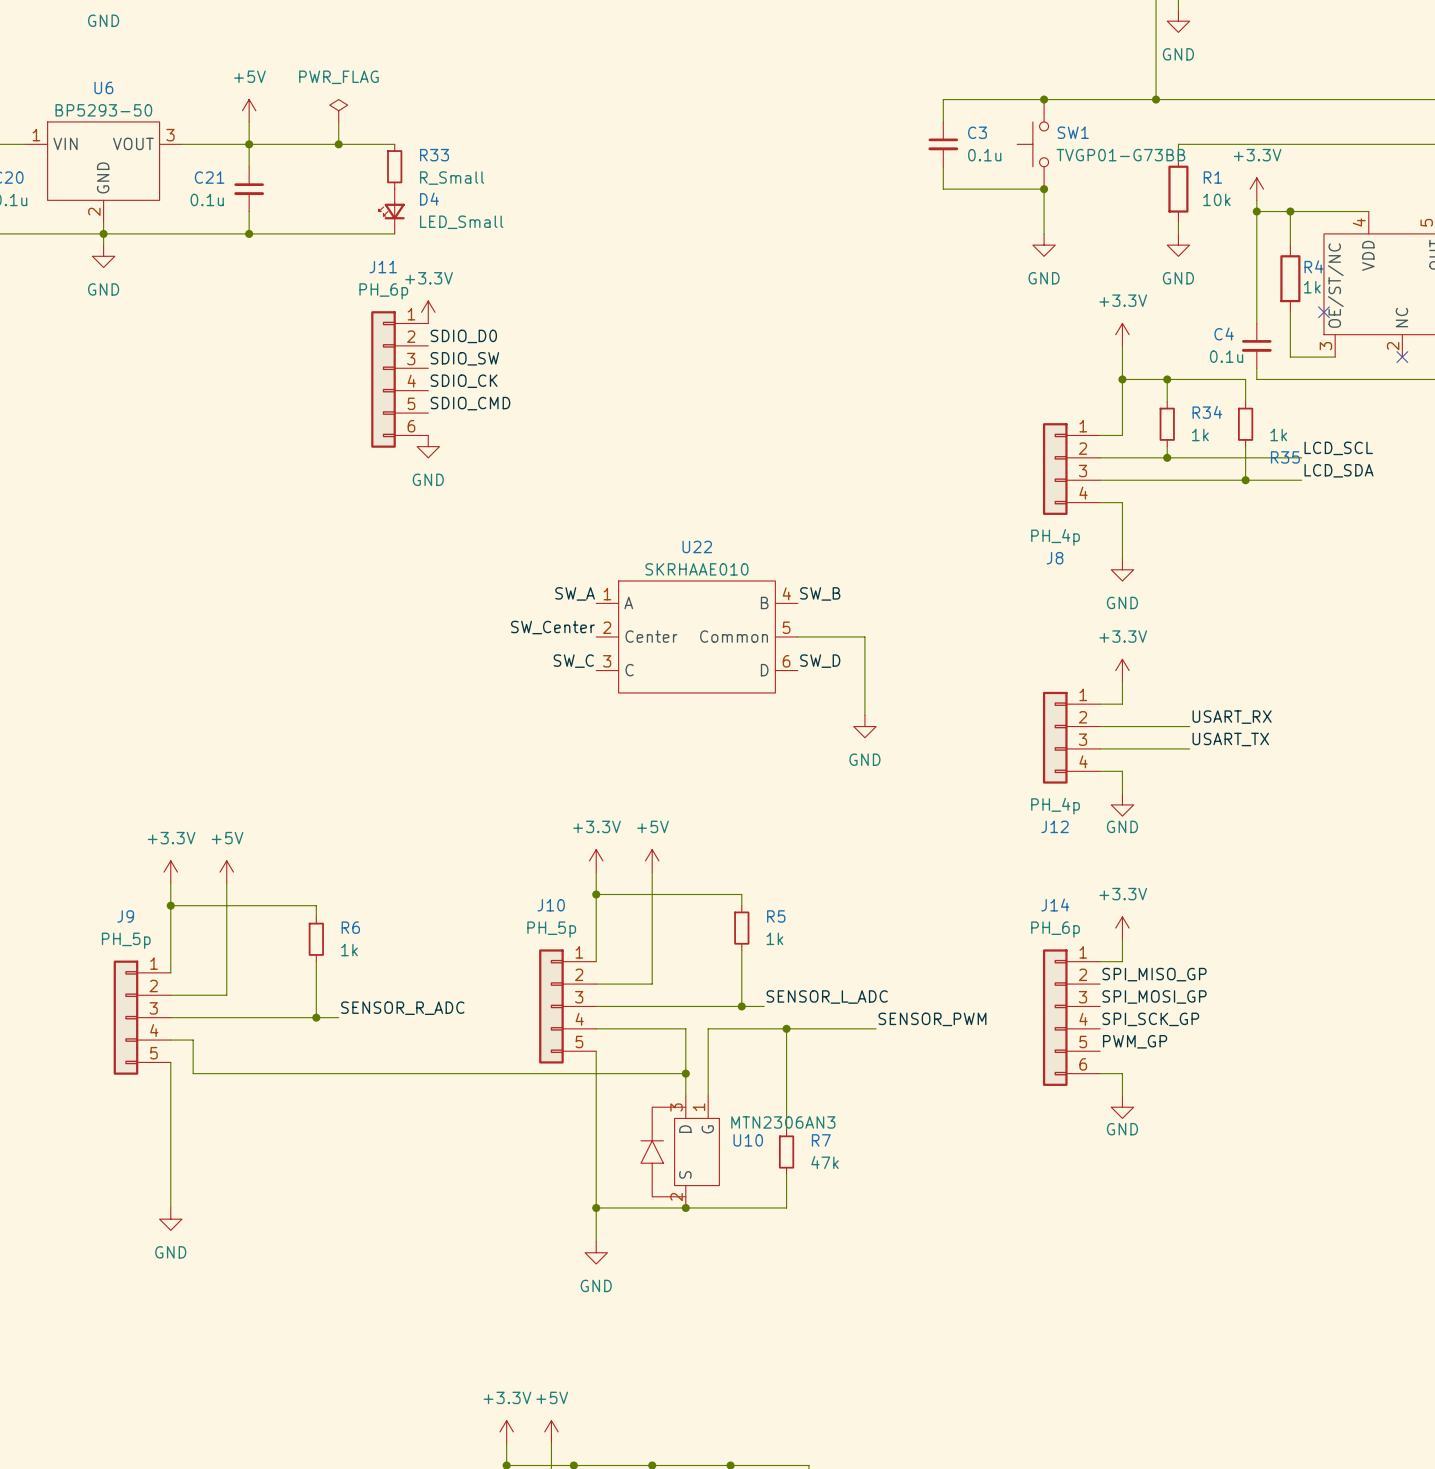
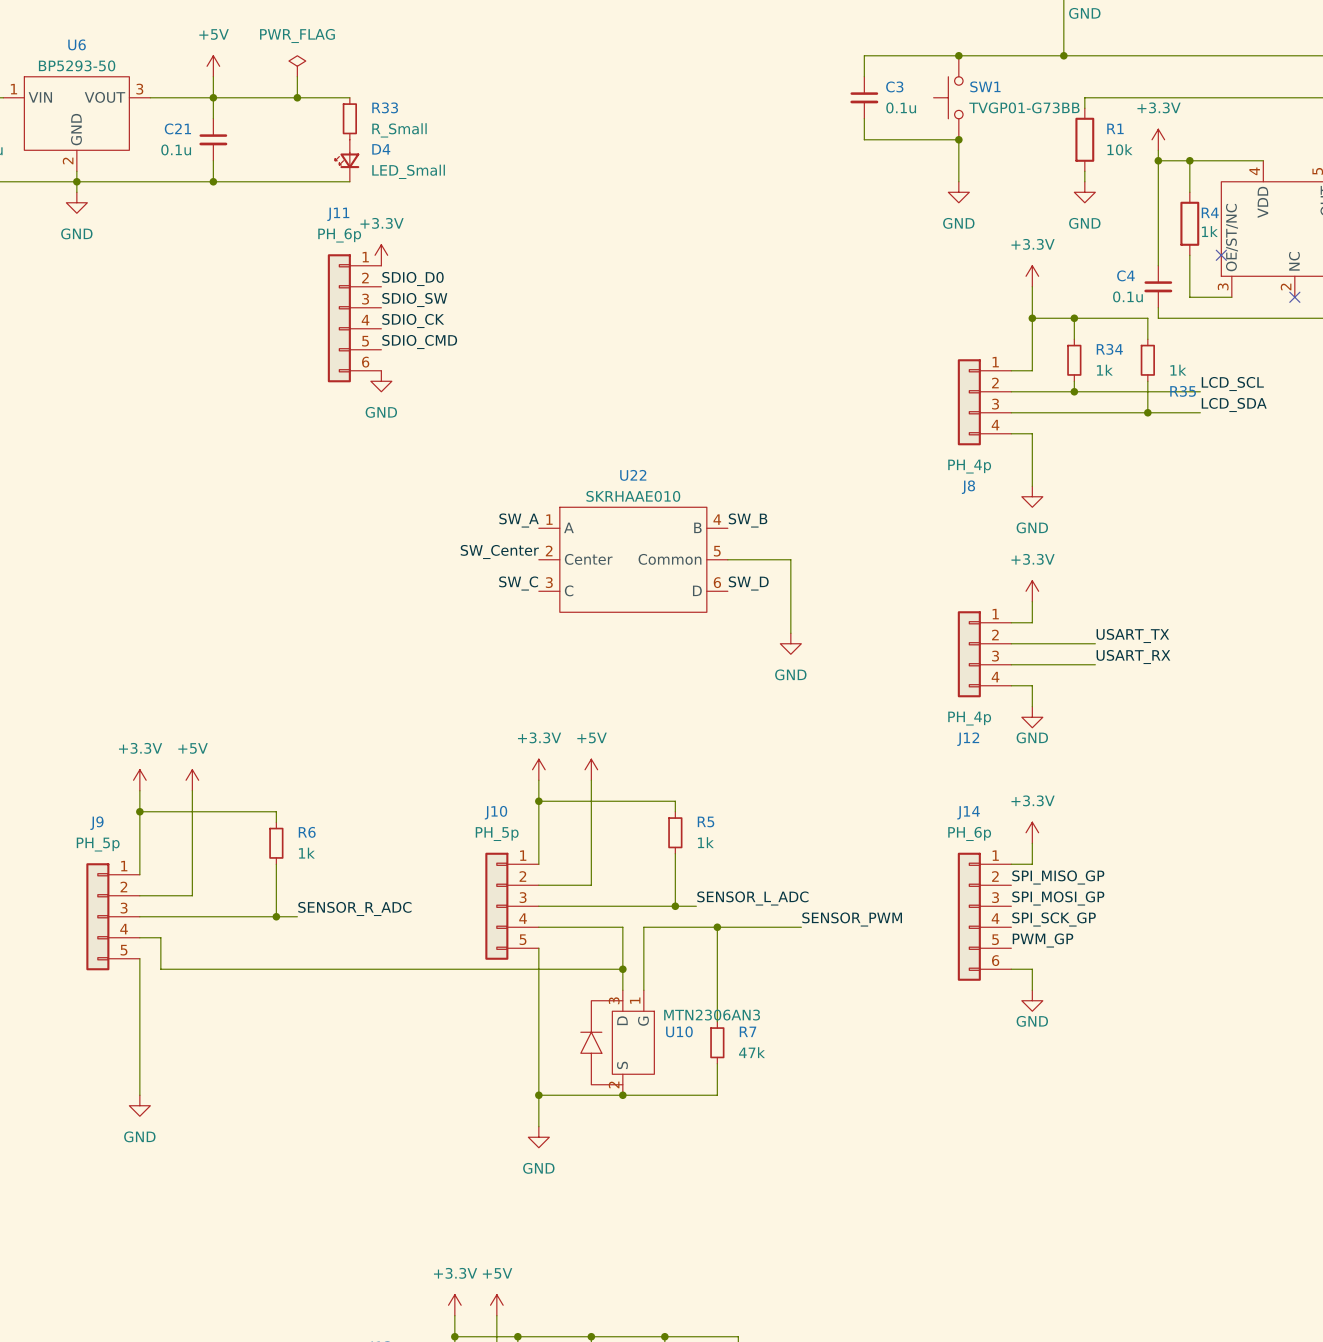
label: USART_RX (1232, 717) -> USART_TX (1132, 635)
label: USART_TX (1230, 739) -> USART_RX (1133, 656)

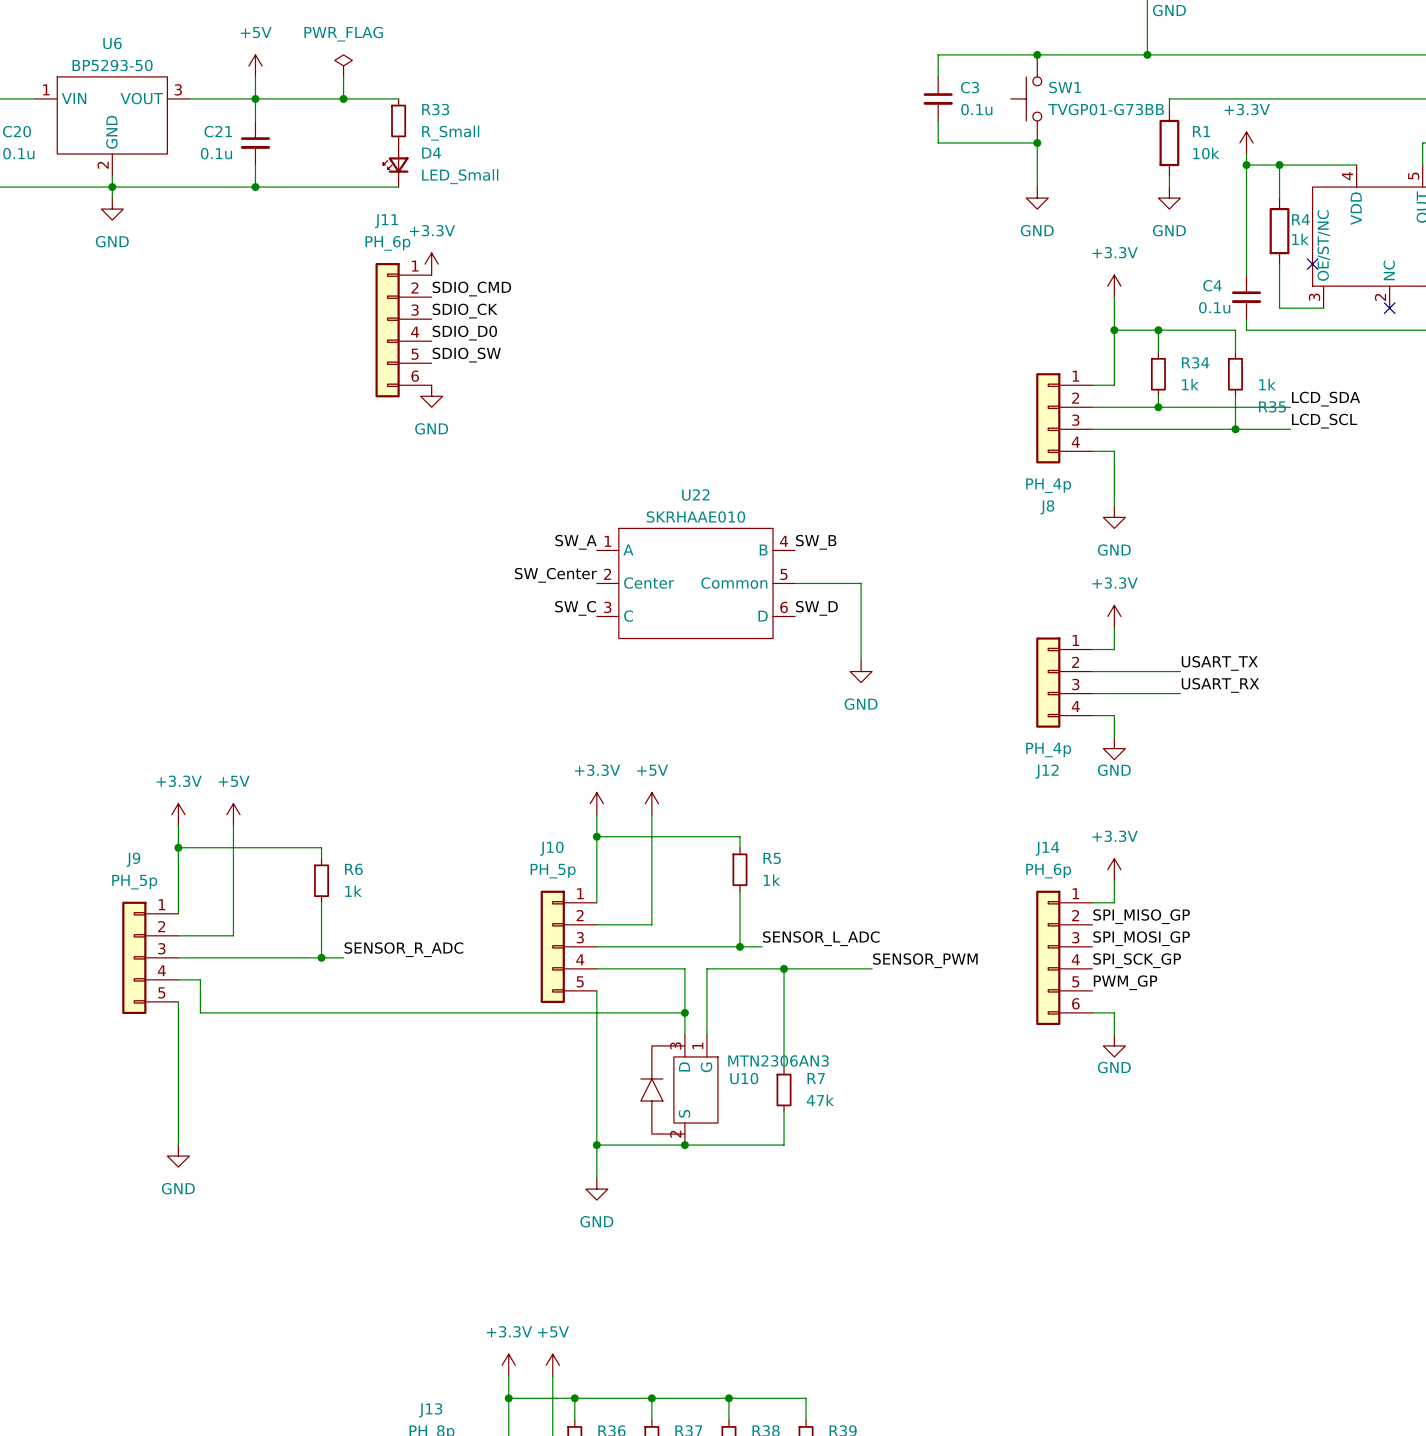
label: SDIO_D0 (412, 279) -> SDIO_CMD (471, 289)
label: SDIO_SW (414, 300) -> SDIO_CK (465, 311)
label: SDIO_CK (413, 321) -> SDIO_D0 (464, 333)
label: SDIO_CMD (419, 342) -> SDIO_SW (466, 355)
label: LCD_SCL (1232, 384) -> LCD_SDA (1326, 399)
label: LCD_SDA (1234, 405) -> LCD_SCL (1324, 421)

